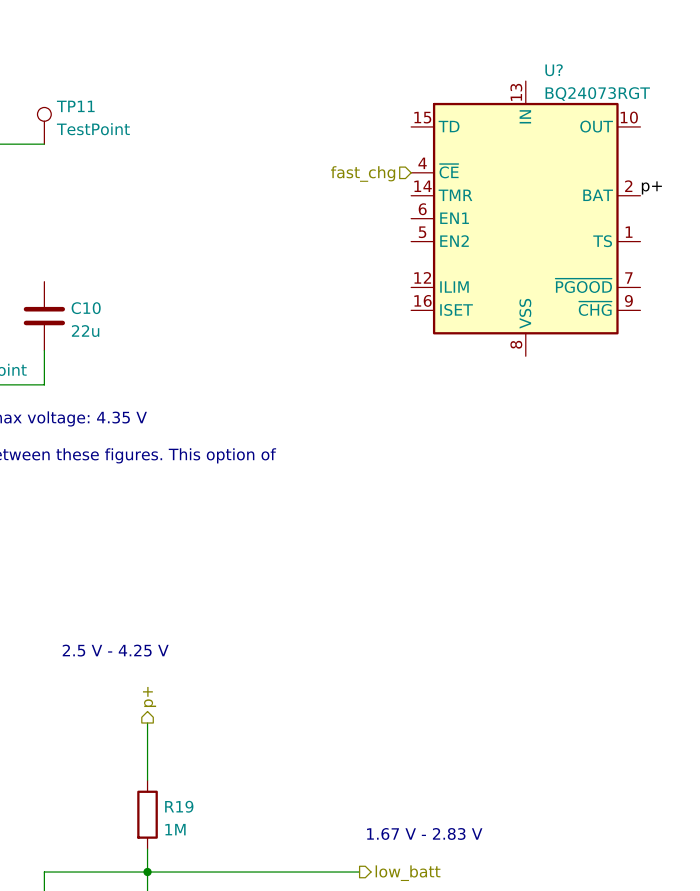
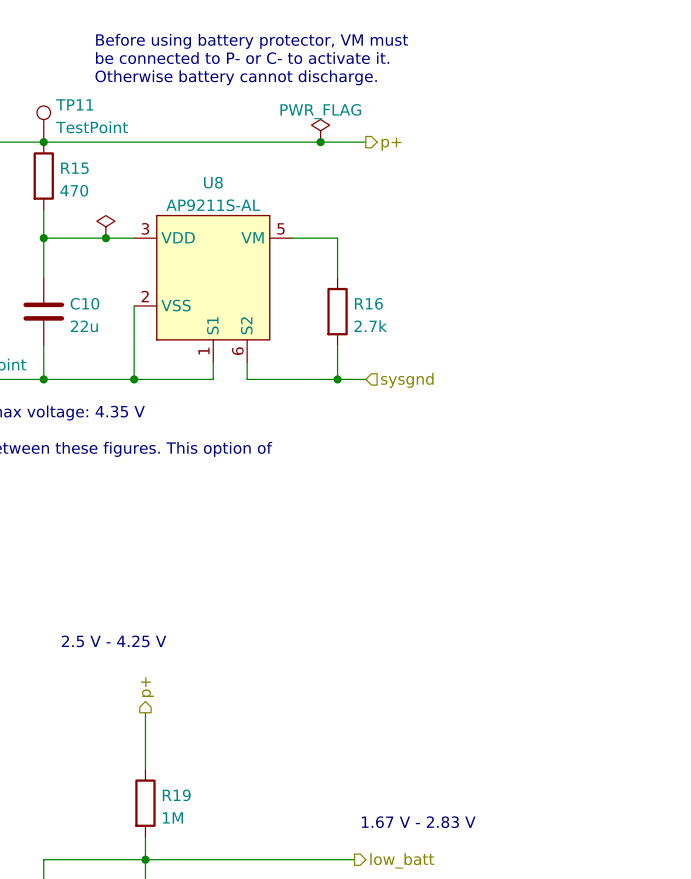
text: none -> Before using battery protector, VM must (252, 41)
text: none -> be connected to P- or C- to activate it. (242, 58)
text: none -> Otherwise battery cannot discharge. (236, 77)
power symbol: none -> PWR_FLAG (320, 130)
wire: none -> (43, 142) (365, 142)
junction: none -> (43, 142)
junction: none -> (320, 142)
hierarchical label: none -> p+ (391, 144)
hierarchical label: fast_chg (363, 174) -> none
R15: none -> 470 (43, 176)
label: p+ (651, 187) -> none
wire: none -> (43, 209) (43, 277)
U?: BQ24073RGT (525, 218) -> none
power symbol: none -> (105, 226)
wire: none -> (43, 238) (134, 238)
junction: none -> (43, 238)
junction: none -> (105, 238)
wire: none -> (292, 238) (337, 238) (337, 277)
U8: none -> AP9211S-AL (213, 288)
wire: none -> (134, 305) (134, 379)
R16: none -> 2.7k (337, 311)
wire: none -> (337, 345) (337, 379)
wire: none -> (213, 362) (213, 379) (43, 379)
wire: none -> (247, 362) (247, 379) (365, 379)
junction: none -> (43, 379)
junction: none -> (134, 379)
junction: none -> (337, 379)
hierarchical label: none -> sysgnd (407, 380)

